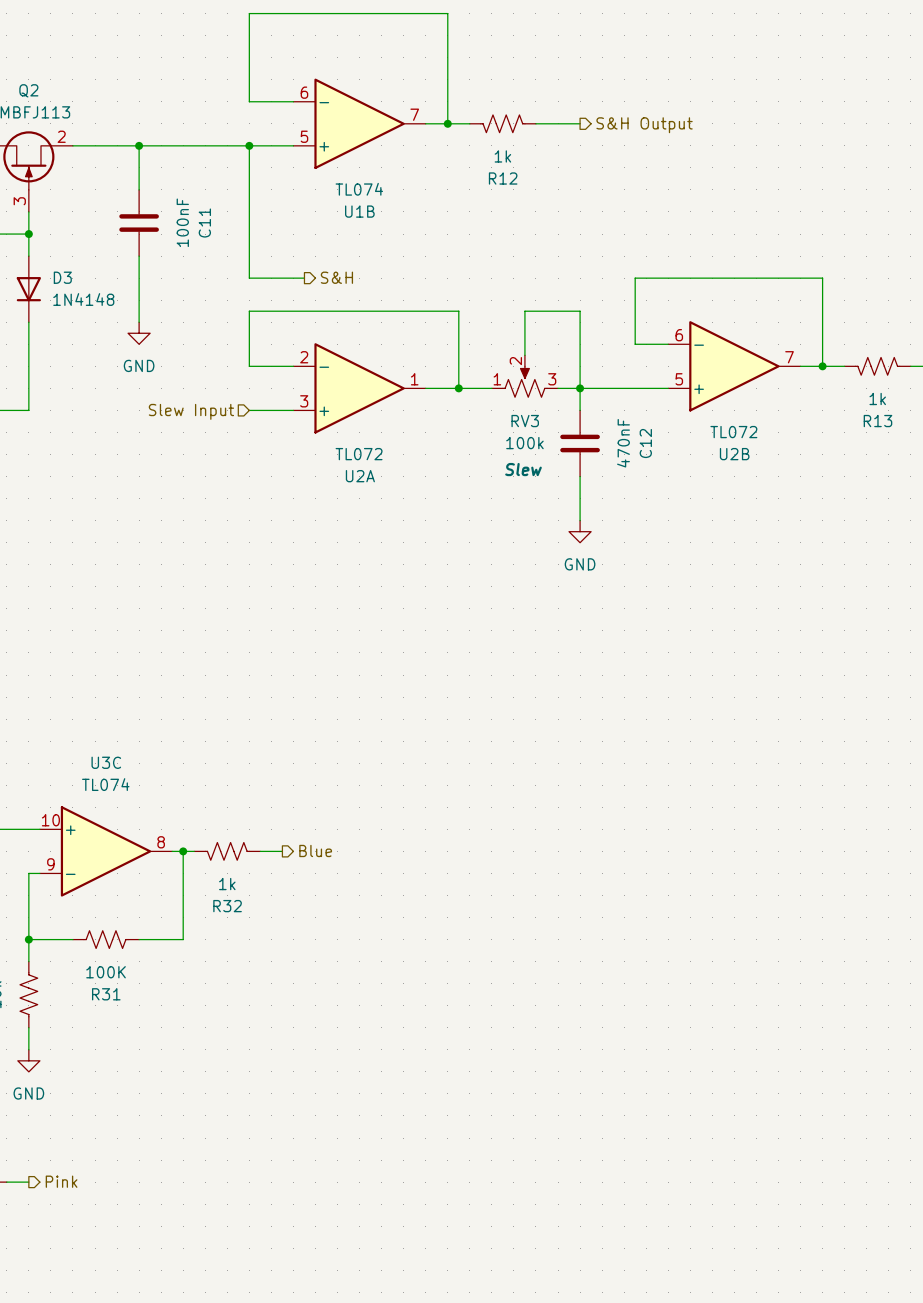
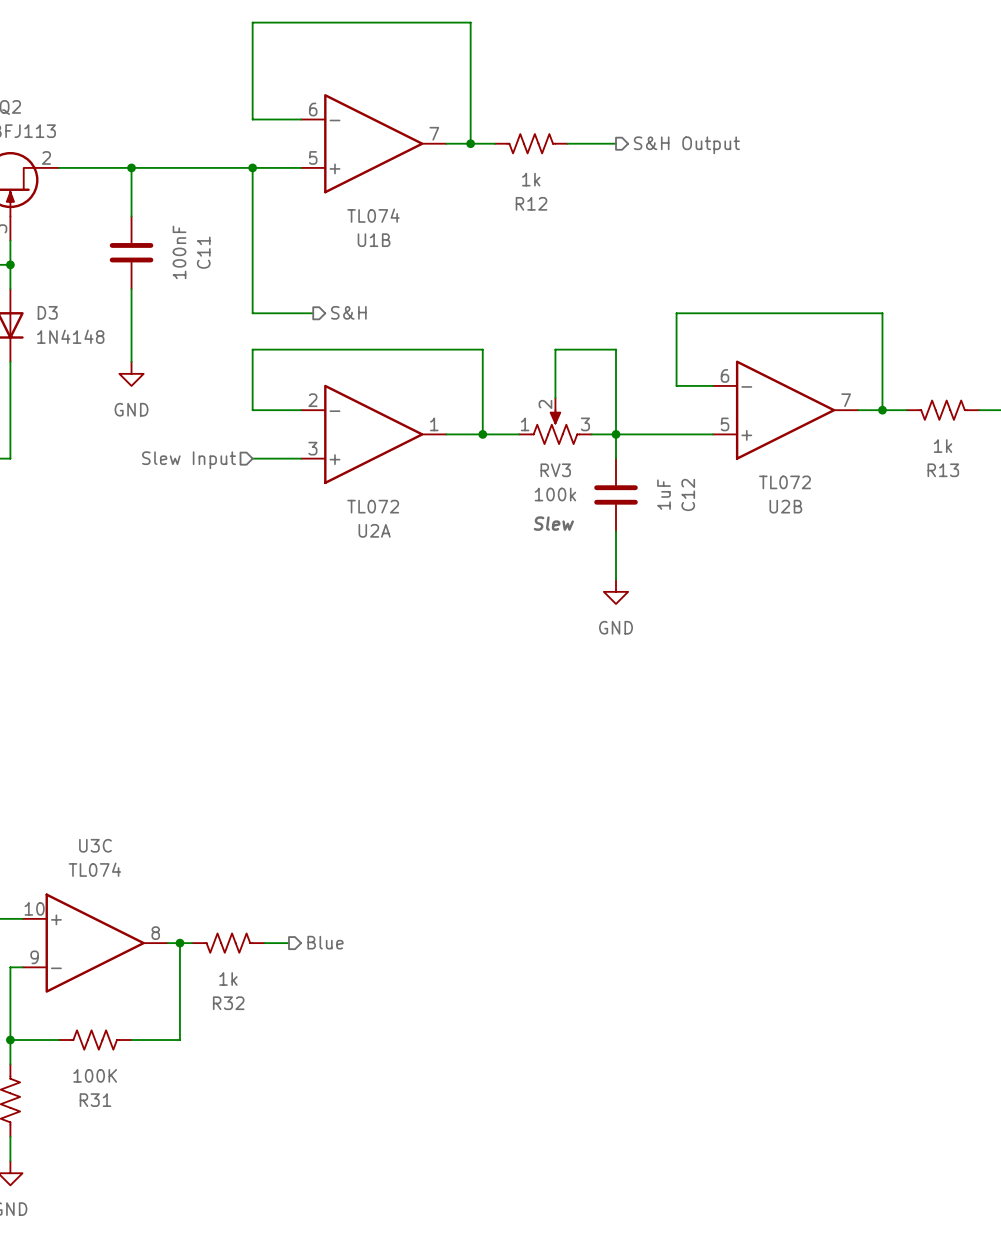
C12 value: 470nF (623, 443) -> 1uF (664, 494)

